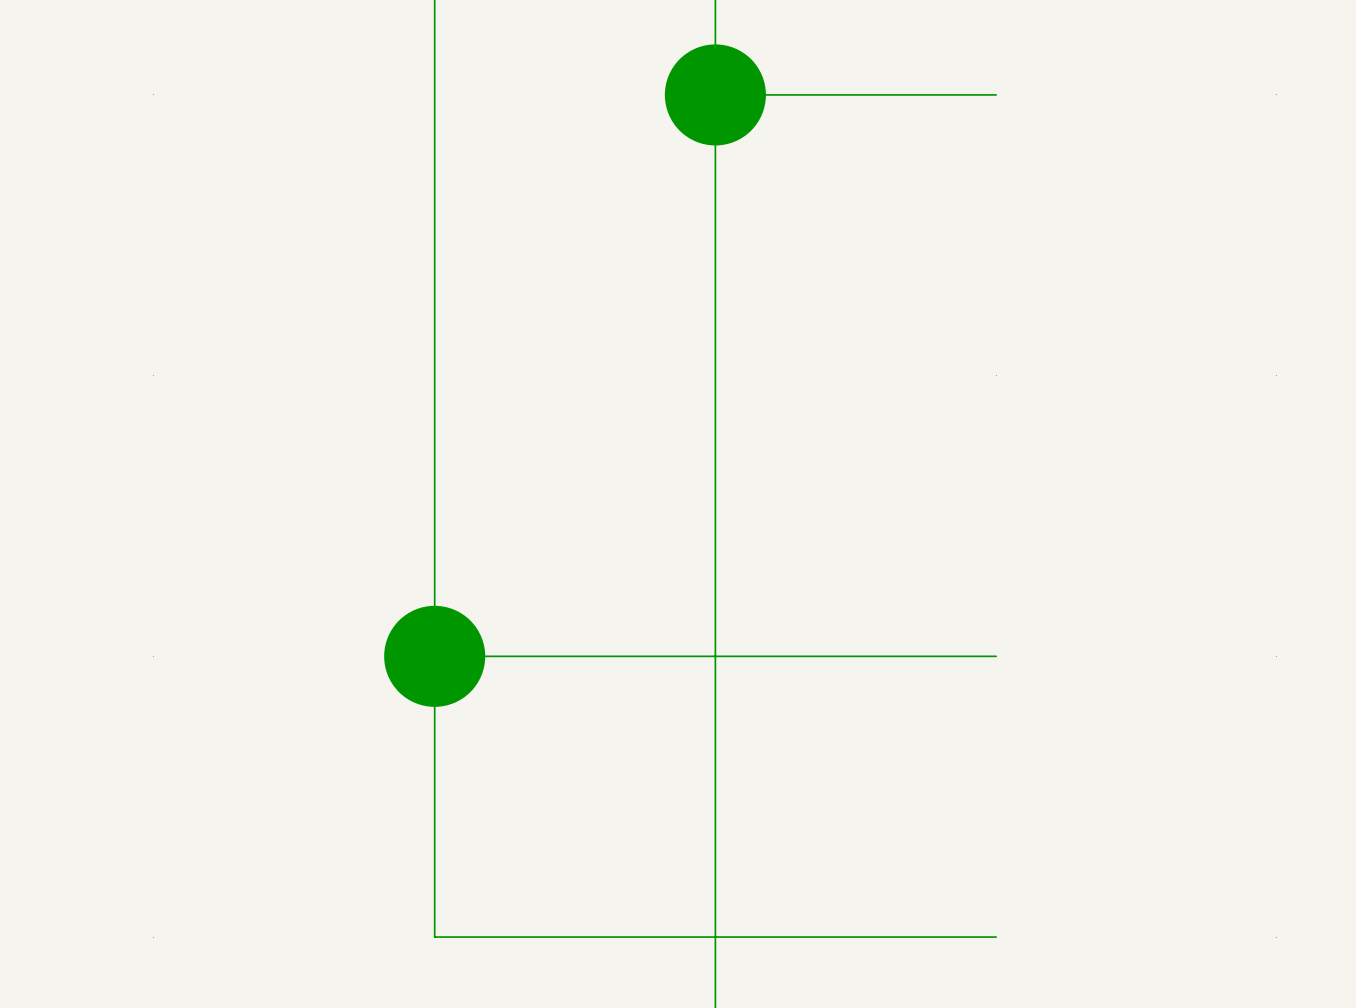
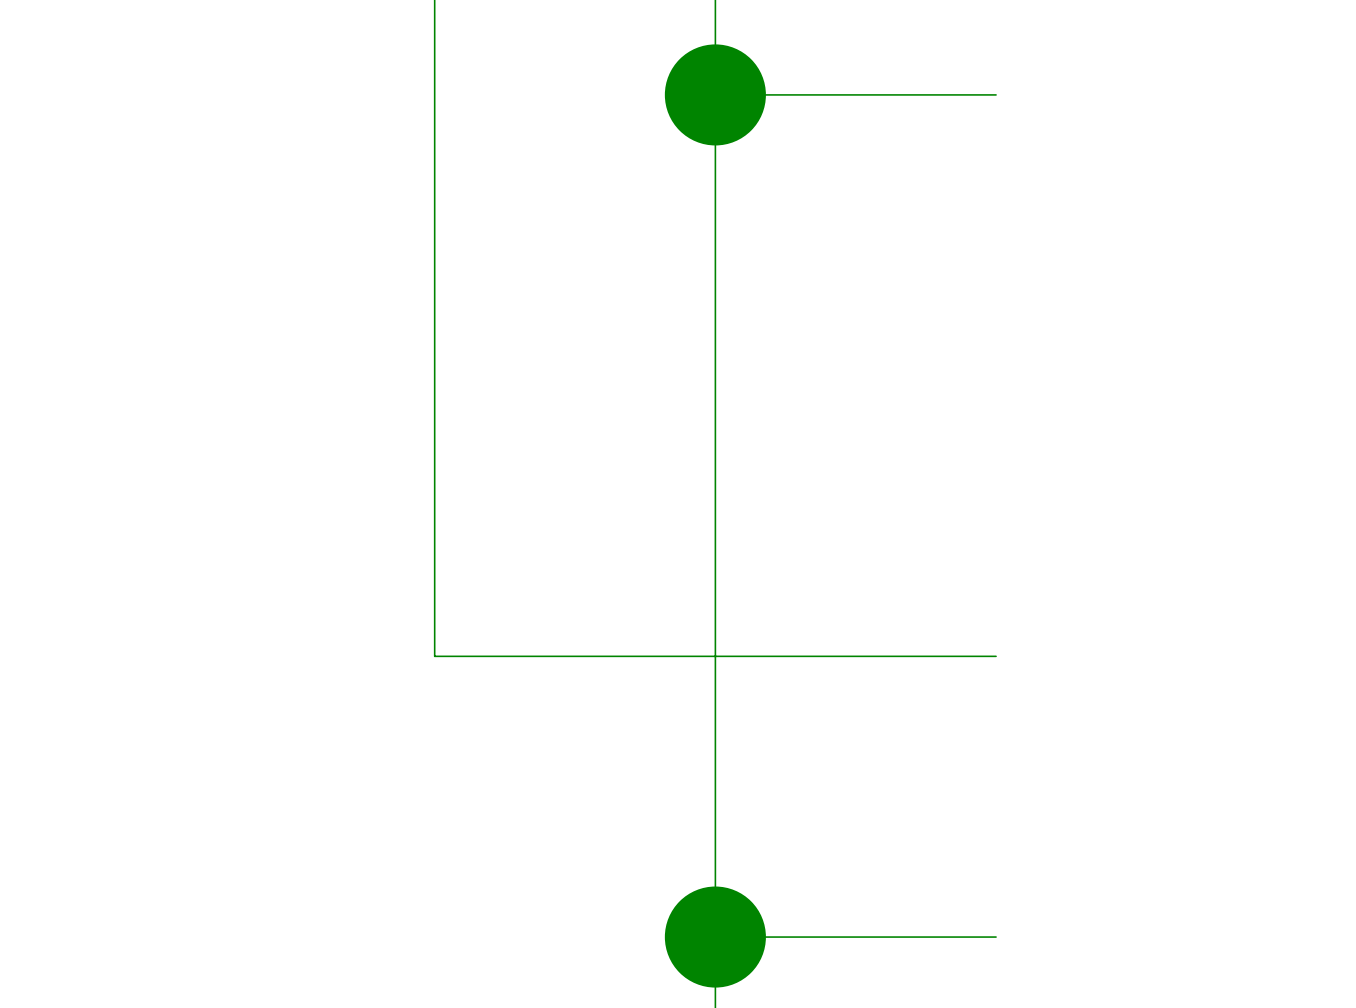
wire: (434, 656) (434, 937) (715, 937) -> none
junction position: (434, 656) -> (715, 937)

